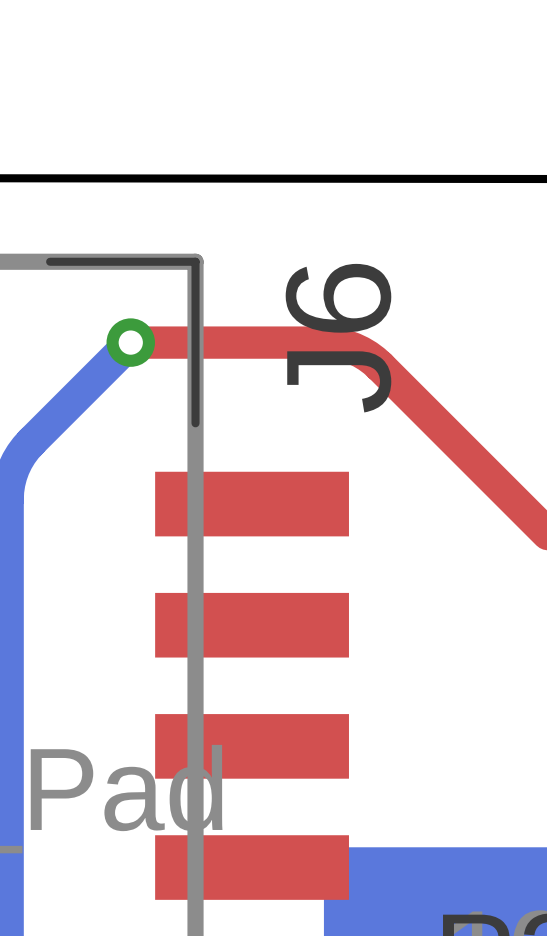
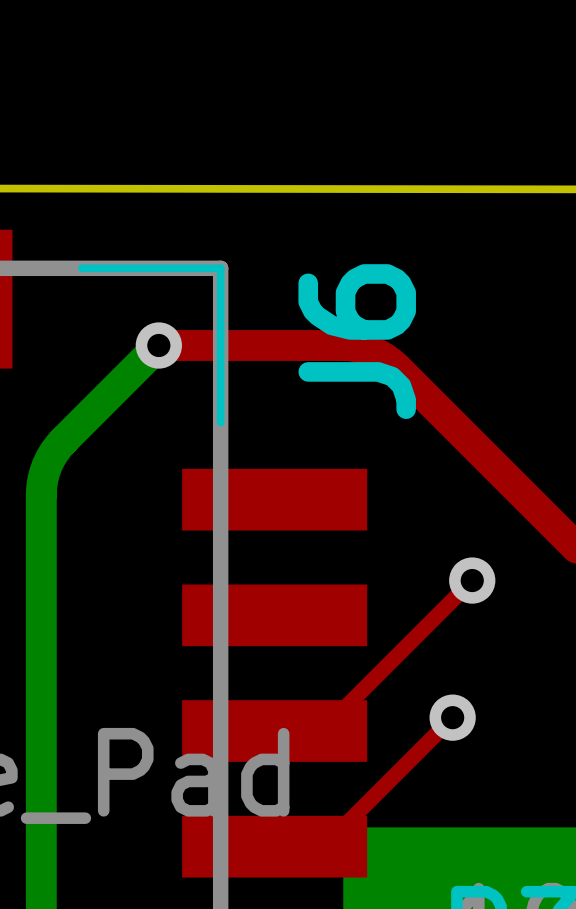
top track: none -> (472, 580) (321, 731) (274, 731)
via: none -> (472, 580)
top track: none -> (452, 717) (323, 846) (274, 846)
via: none -> (452, 717)

